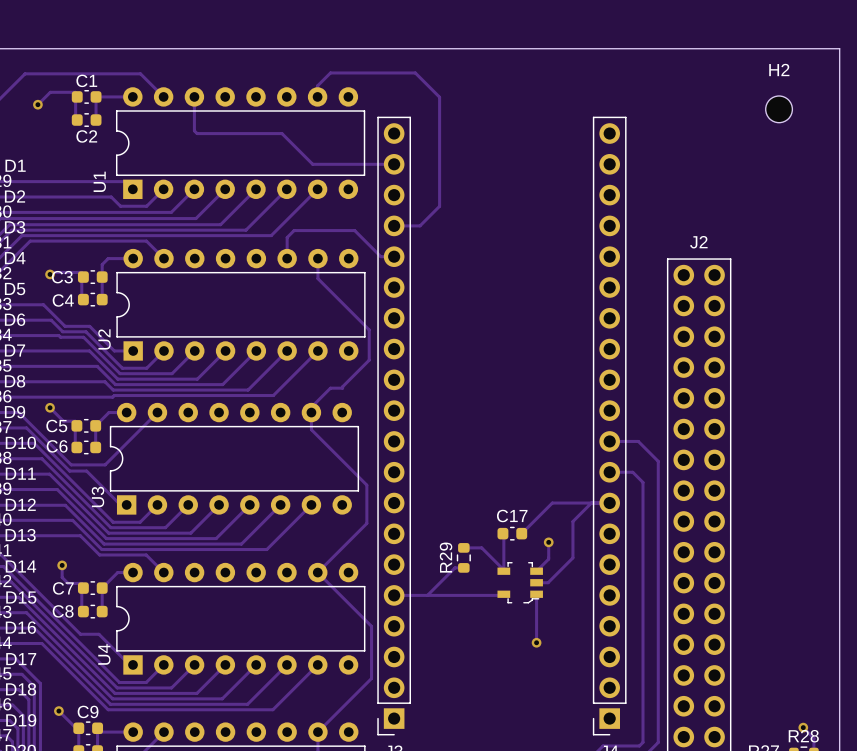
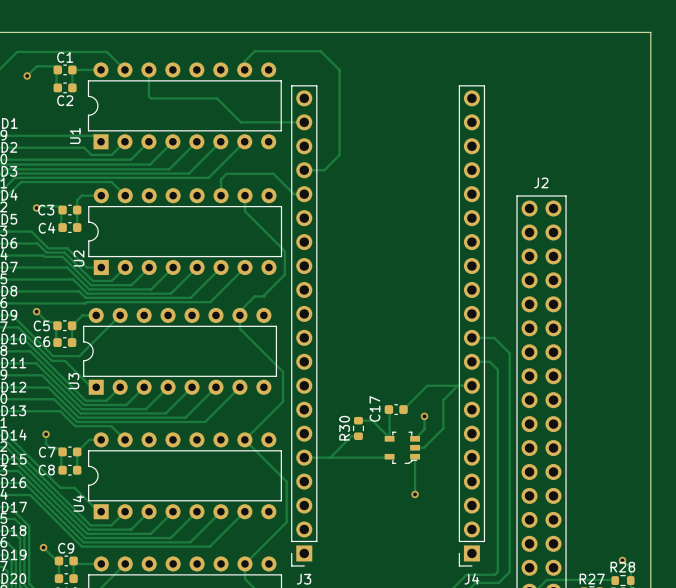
H2: (779, 109) -> none
C17 name rotation: 0° (512, 516) -> 90° counterclockwise (374, 408)
R29 name: R29 (446, 557) -> R30 (344, 428)

